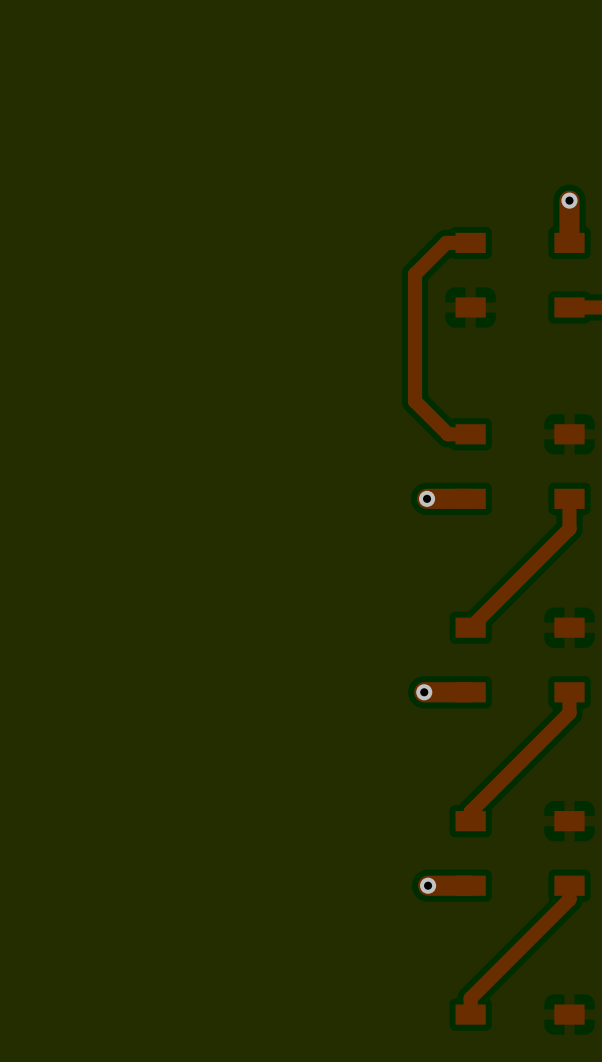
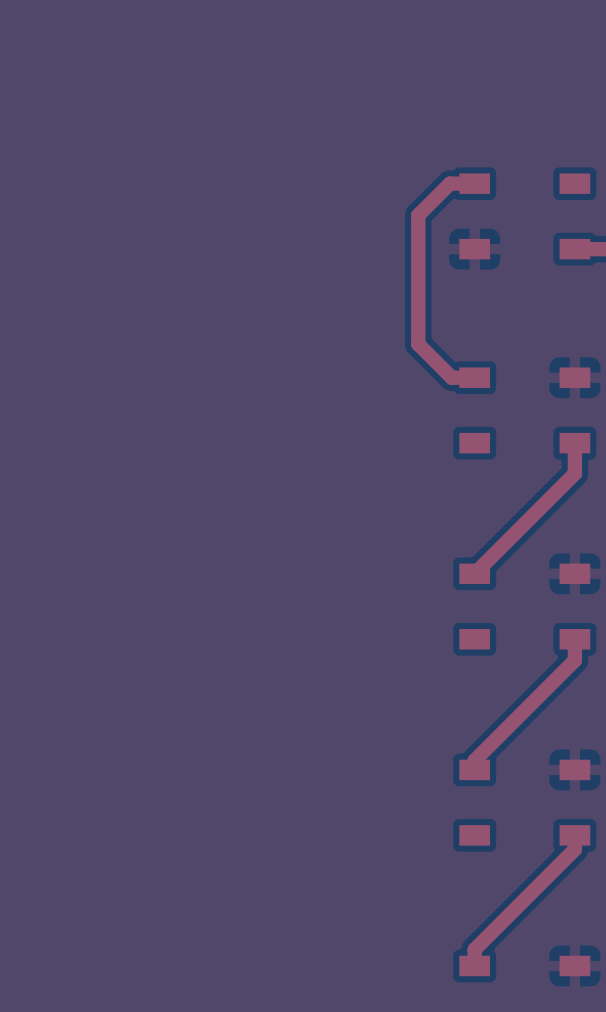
top track: (569, 200) (569, 242) -> none
via: (569, 200) -> none
via: (427, 498) -> none
top track: (470, 498) (427, 498) -> none
via: (424, 692) -> none
top track: (470, 692) (424, 692) -> none
via: (428, 885) -> none
top track: (470, 885) (428, 885) -> none

